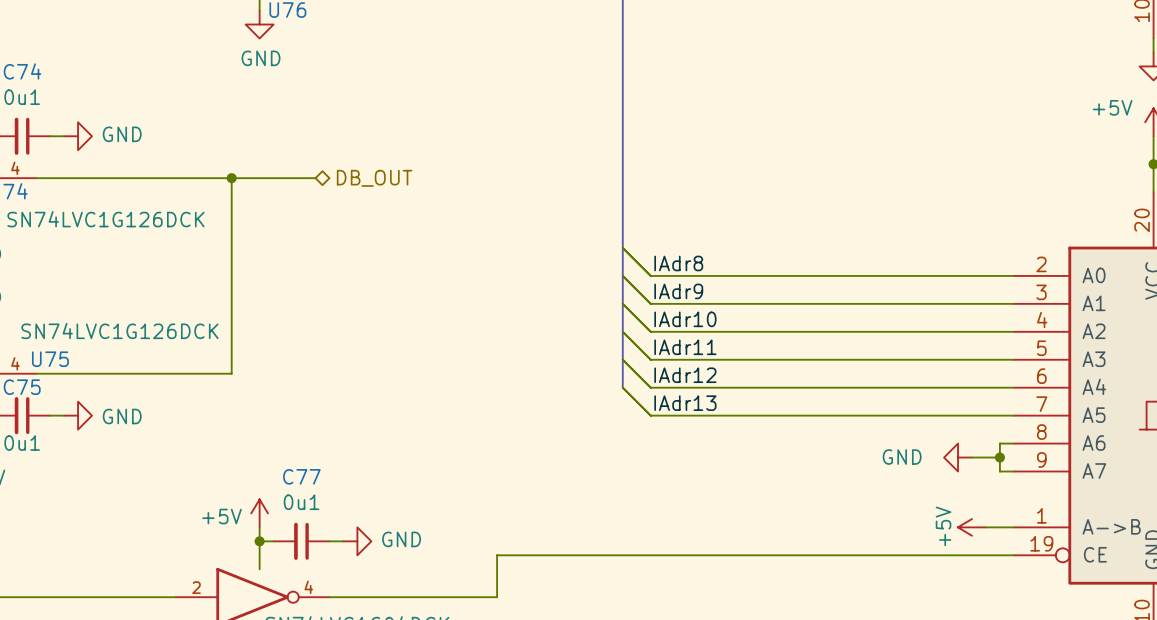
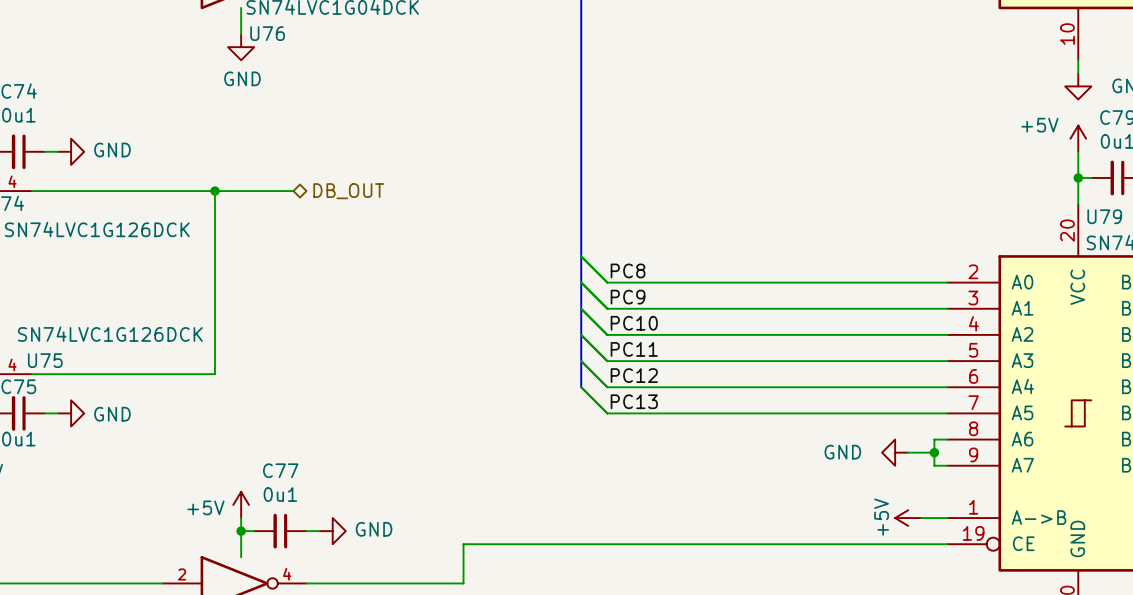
label: IAdr8 (678, 263) -> PC8 (628, 270)
label: IAdr9 (678, 291) -> PC9 (628, 297)
label: IAdr10 (685, 319) -> PC10 (634, 323)
label: IAdr11 (685, 347) -> PC11 (634, 349)
label: IAdr12 (685, 375) -> PC12 (634, 375)
label: IAdr13 (685, 403) -> PC13 (634, 401)

